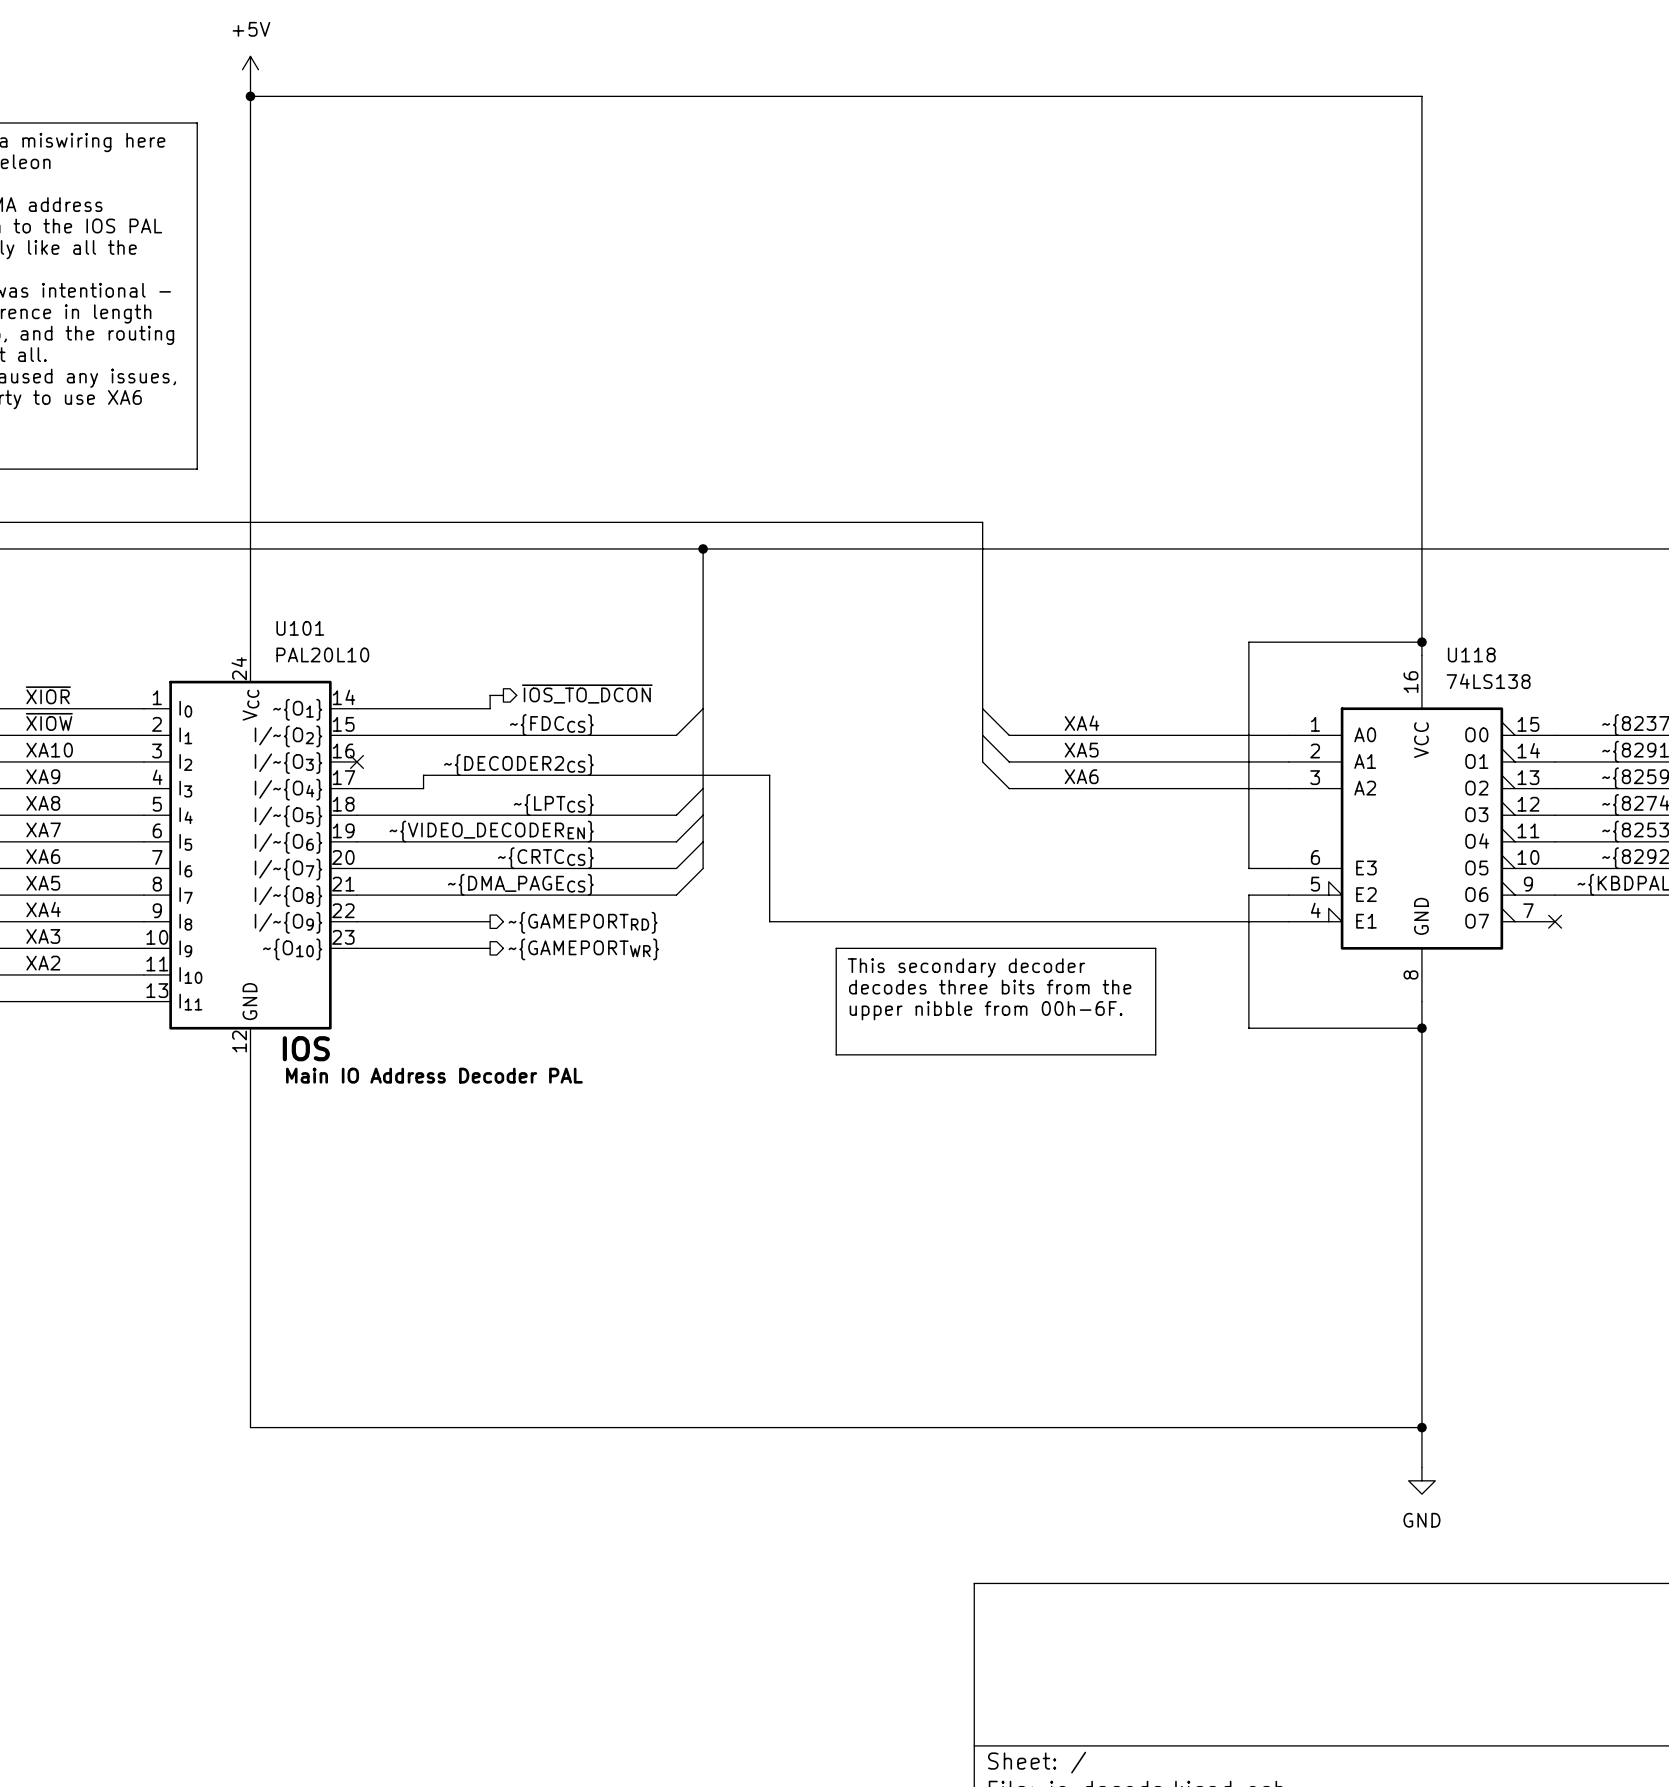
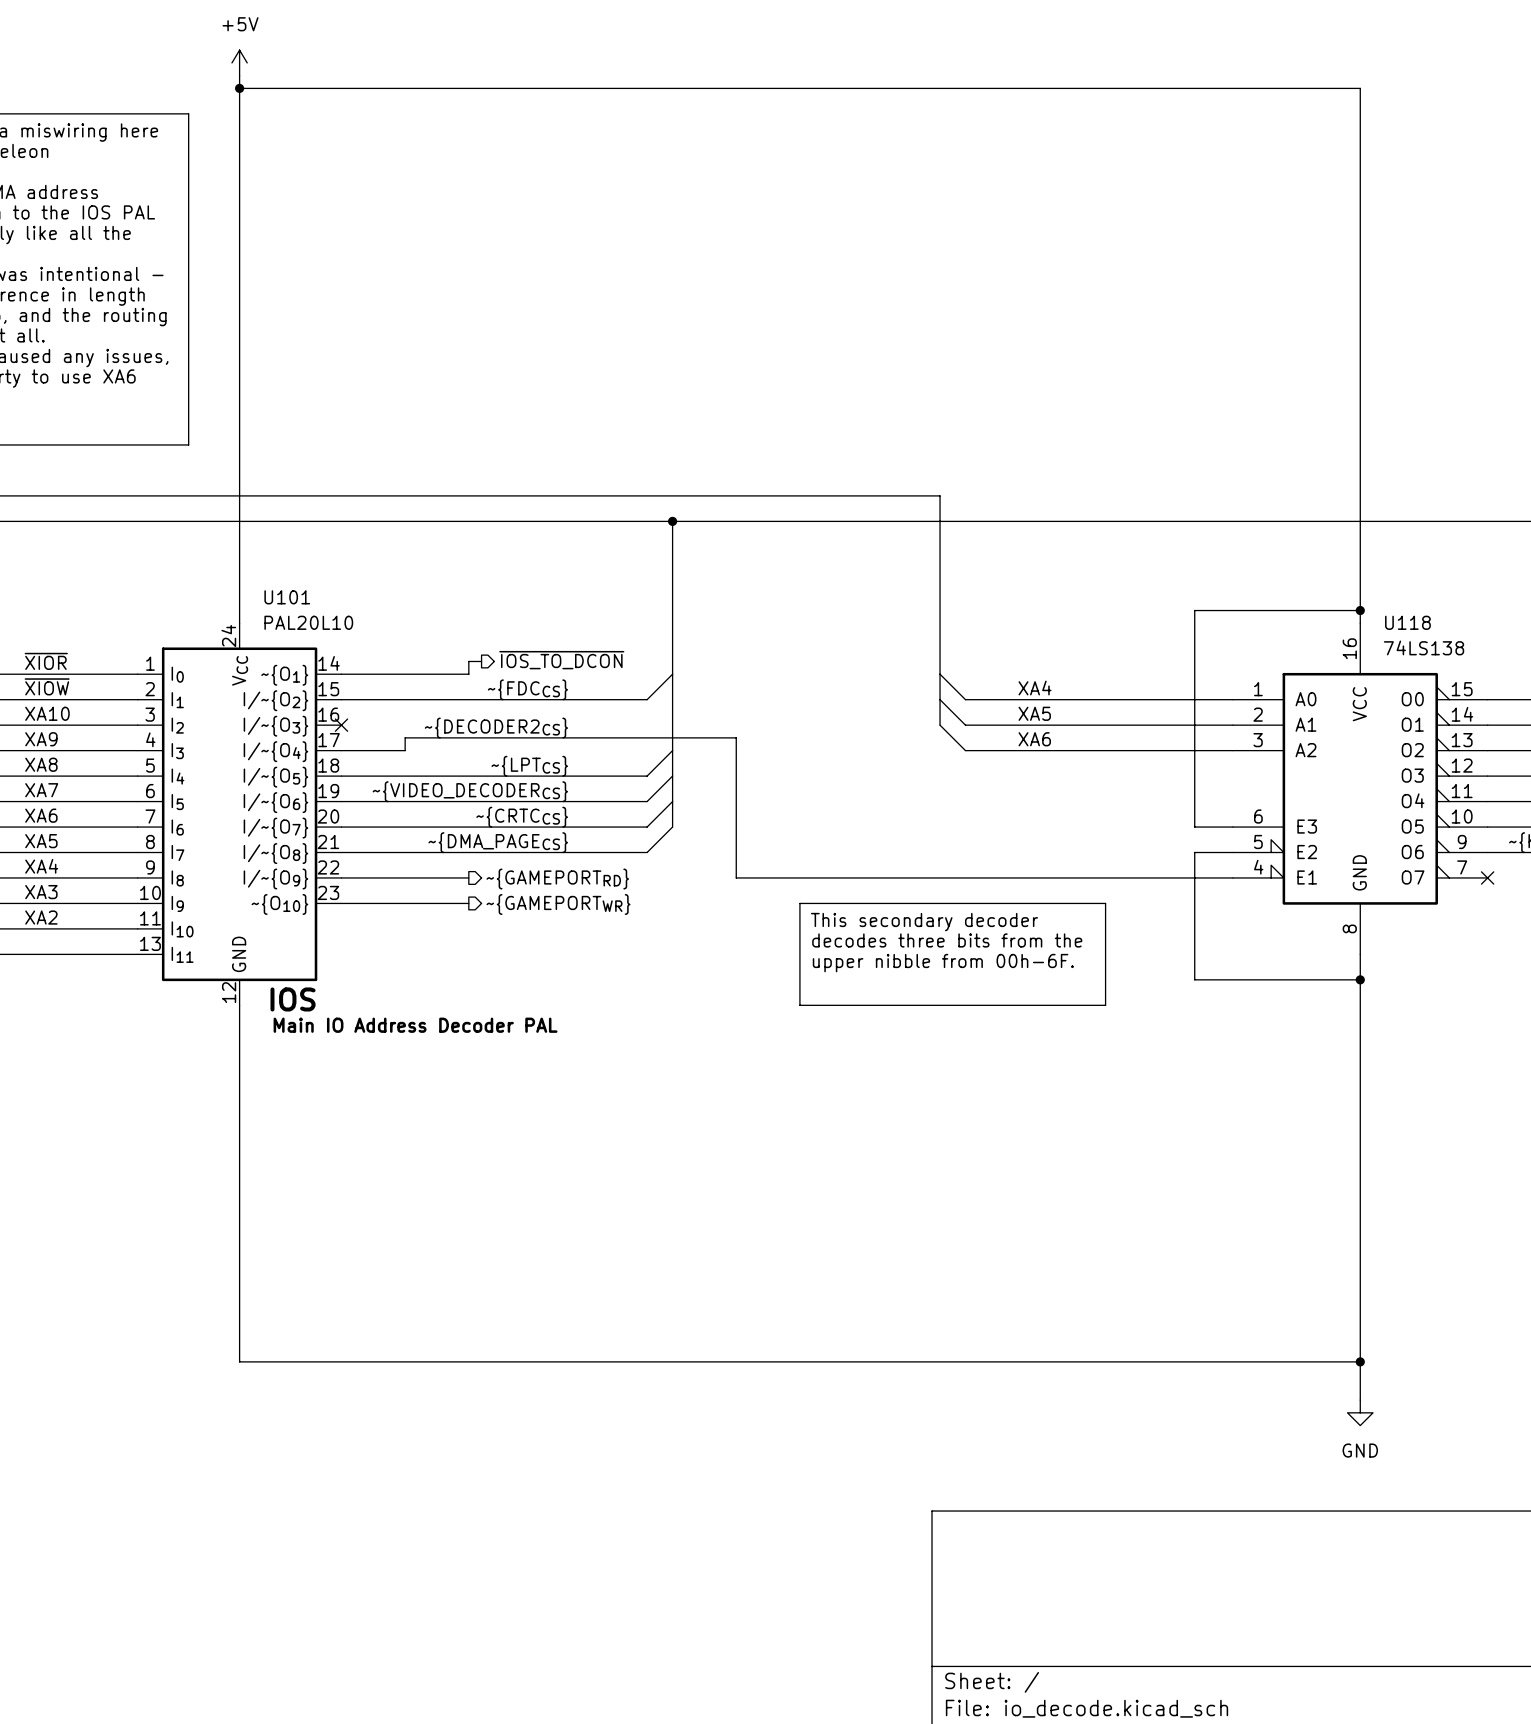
label: ~{VIDEO_DECODEREN} (491, 831) -> ~{VIDEO_DECODERCS} (470, 791)

